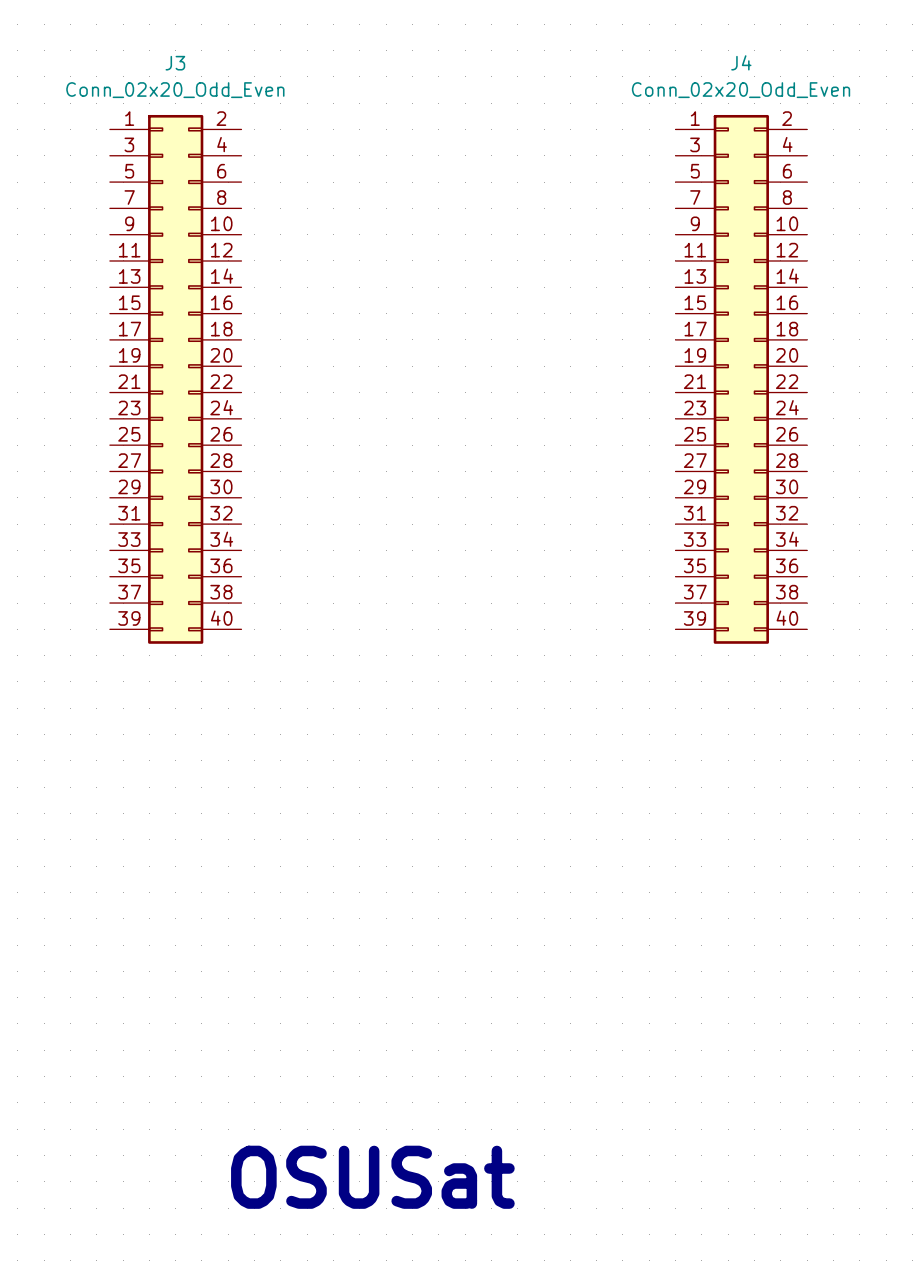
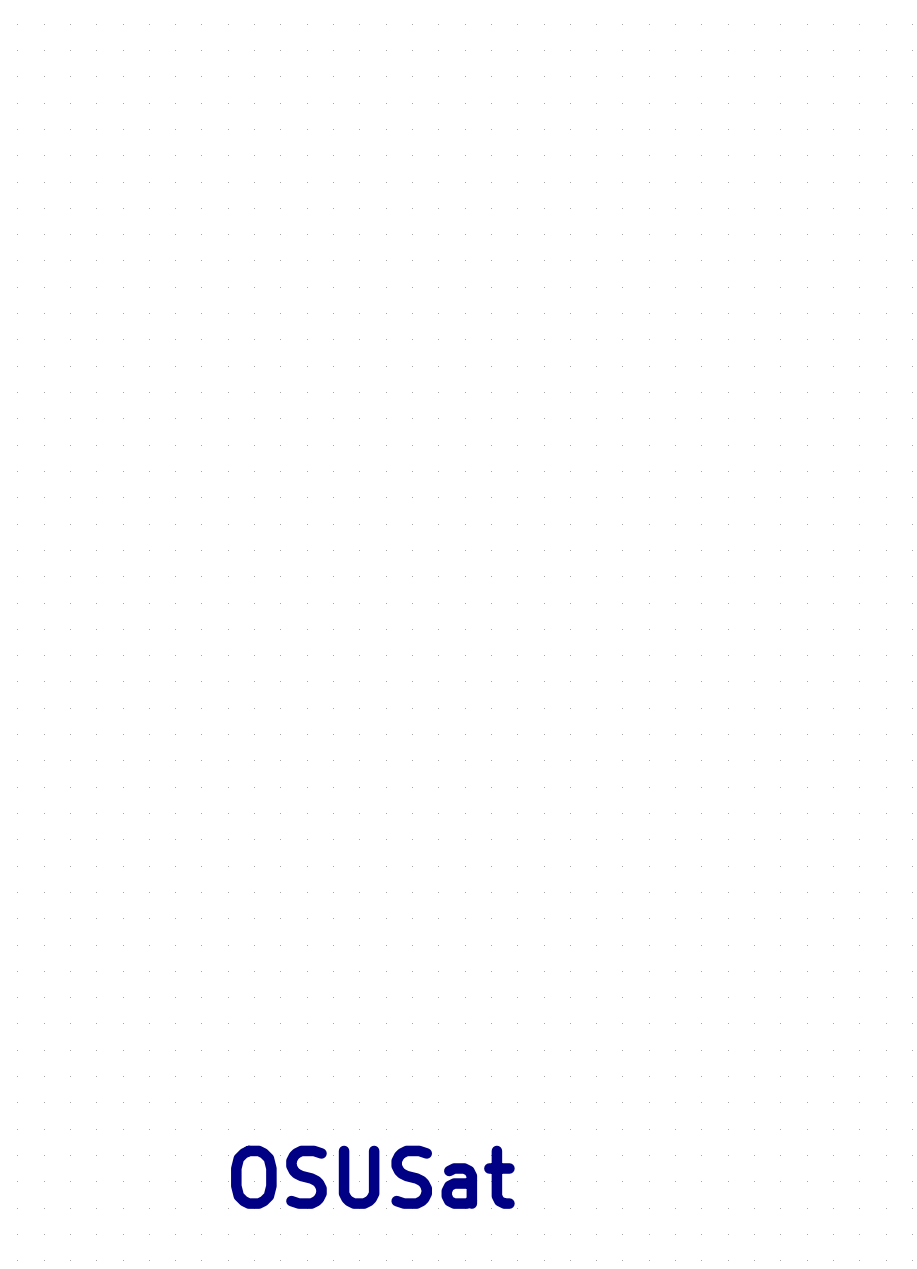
J3: Conn_02x20_Odd_Even (175, 379) -> none
J4: Conn_02x20_Odd_Even (741, 379) -> none

